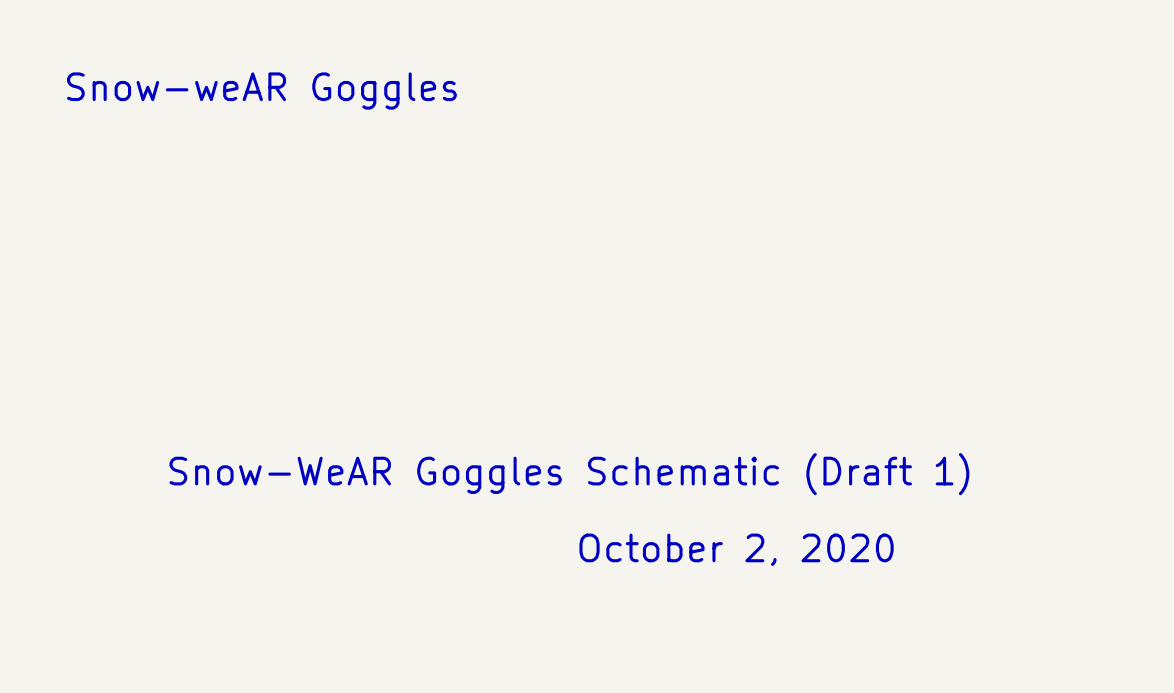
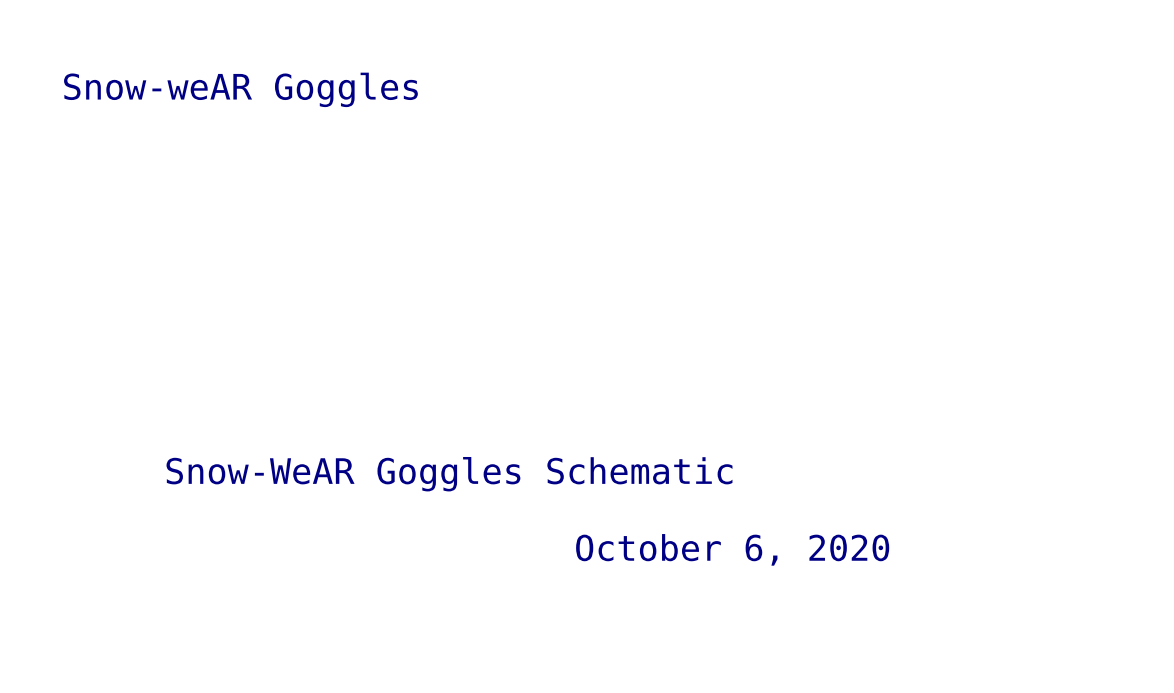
text: Snow-WeAR Goggles Schematic (Draft 1) (569, 474) -> Snow-WeAR Goggles Schematic (449, 474)
text: October 2, 2020 (736, 549) -> October 6, 2020 (732, 549)

